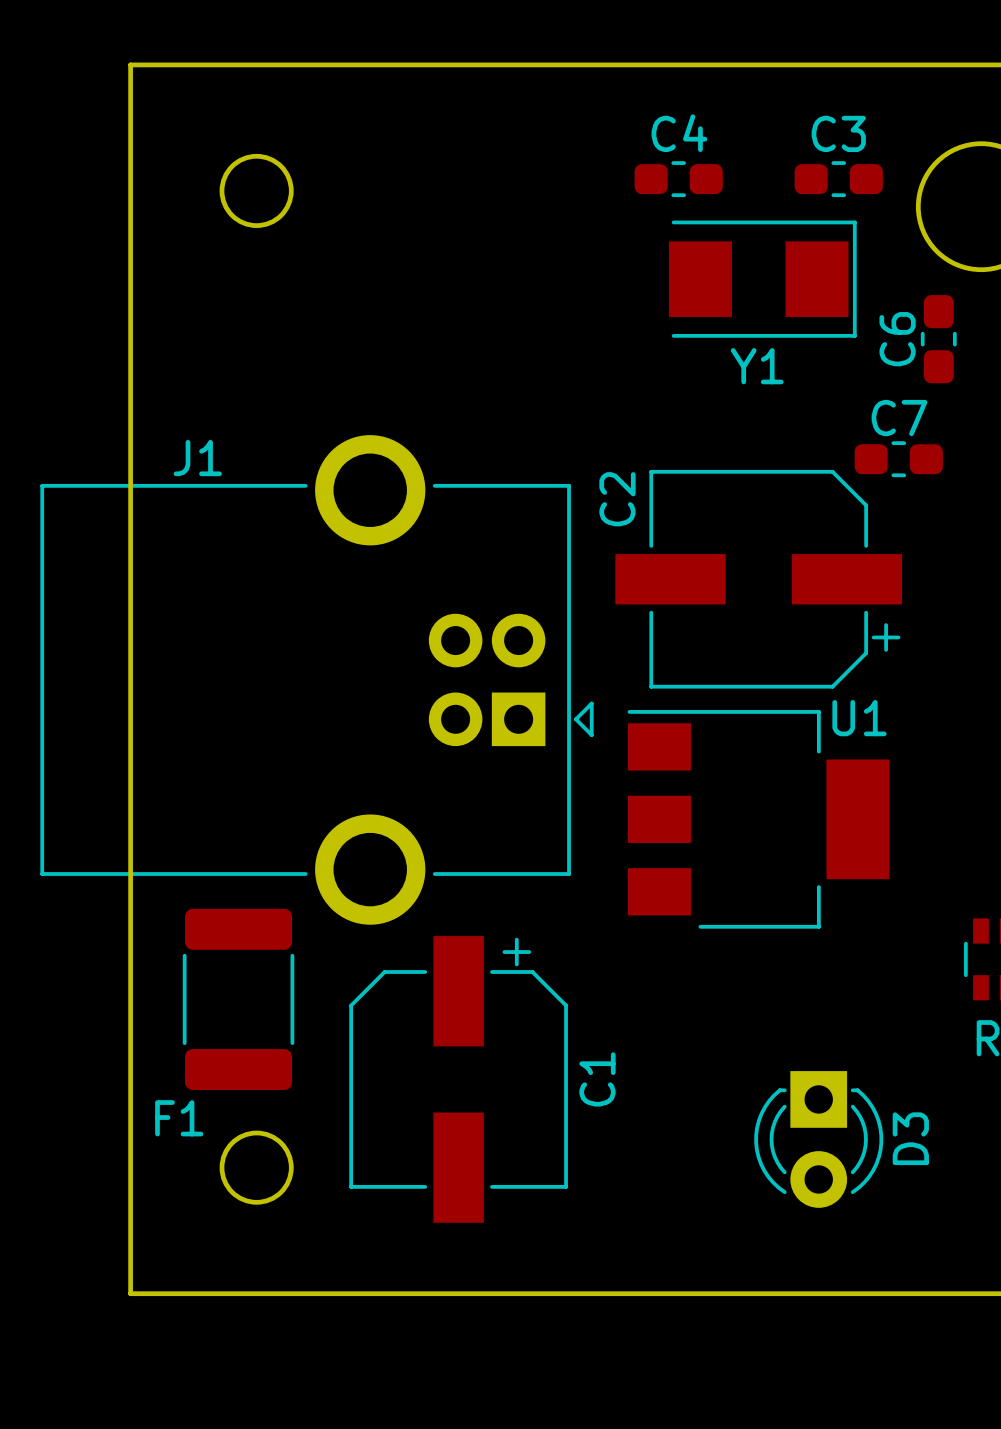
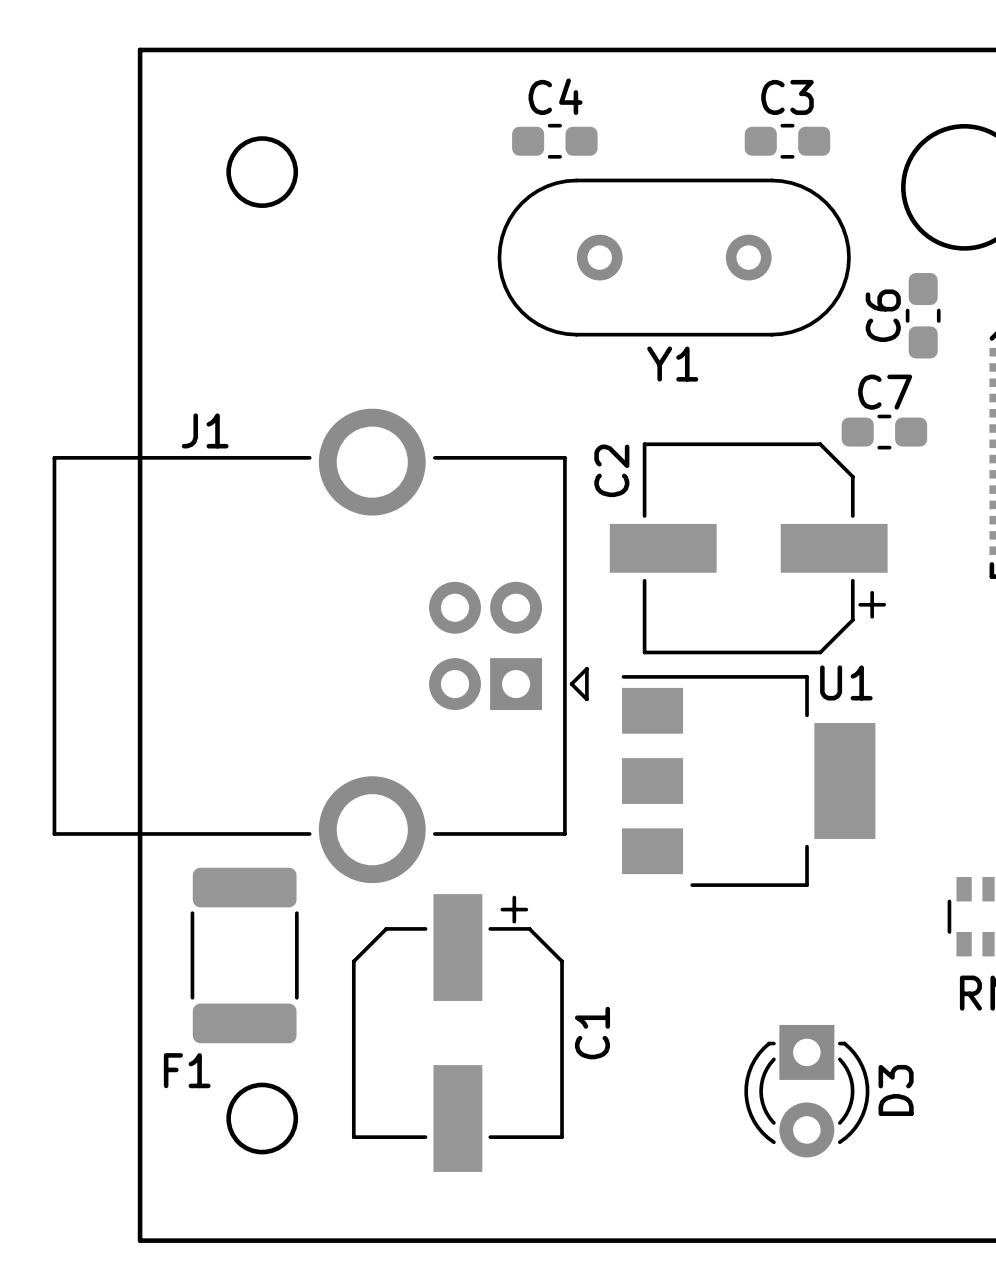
C4 position: (678, 179) -> (554, 141)
C3 position: (838, 179) -> (787, 141)
Y1 footprint: [668, 220, 857, 338] -> [497, 178, 851, 337]

